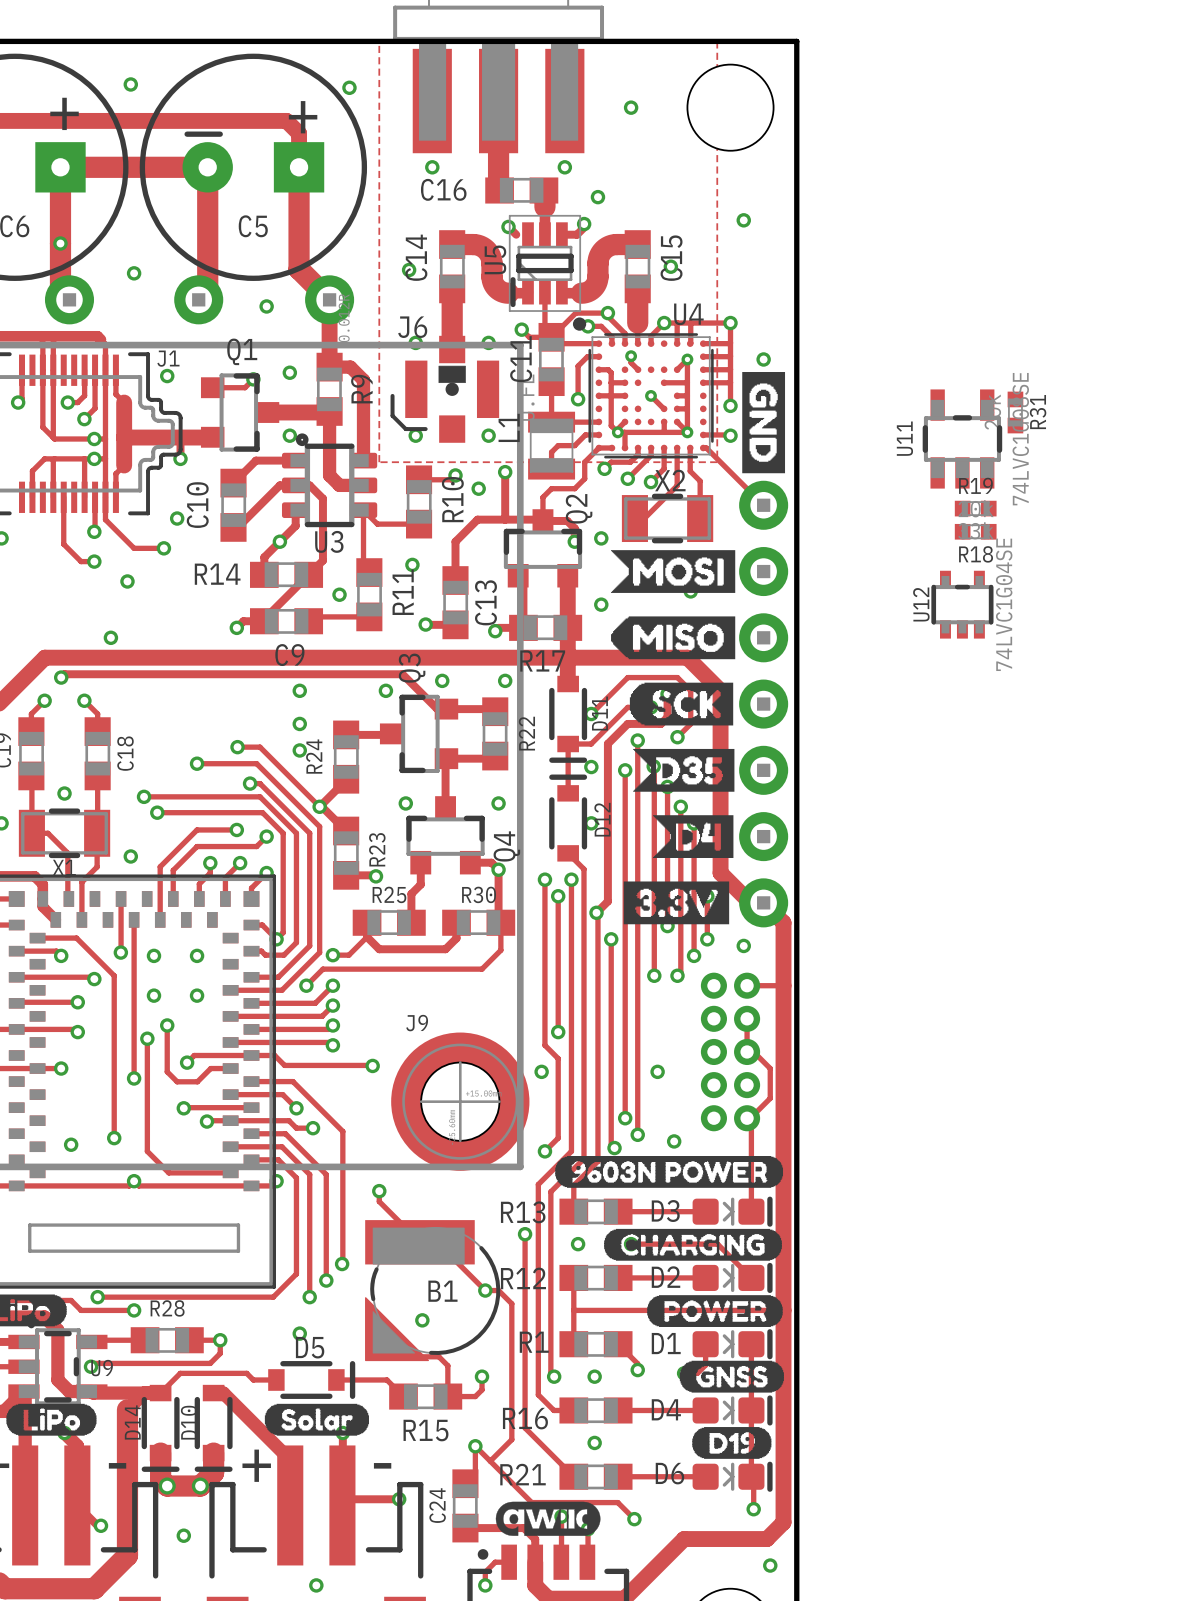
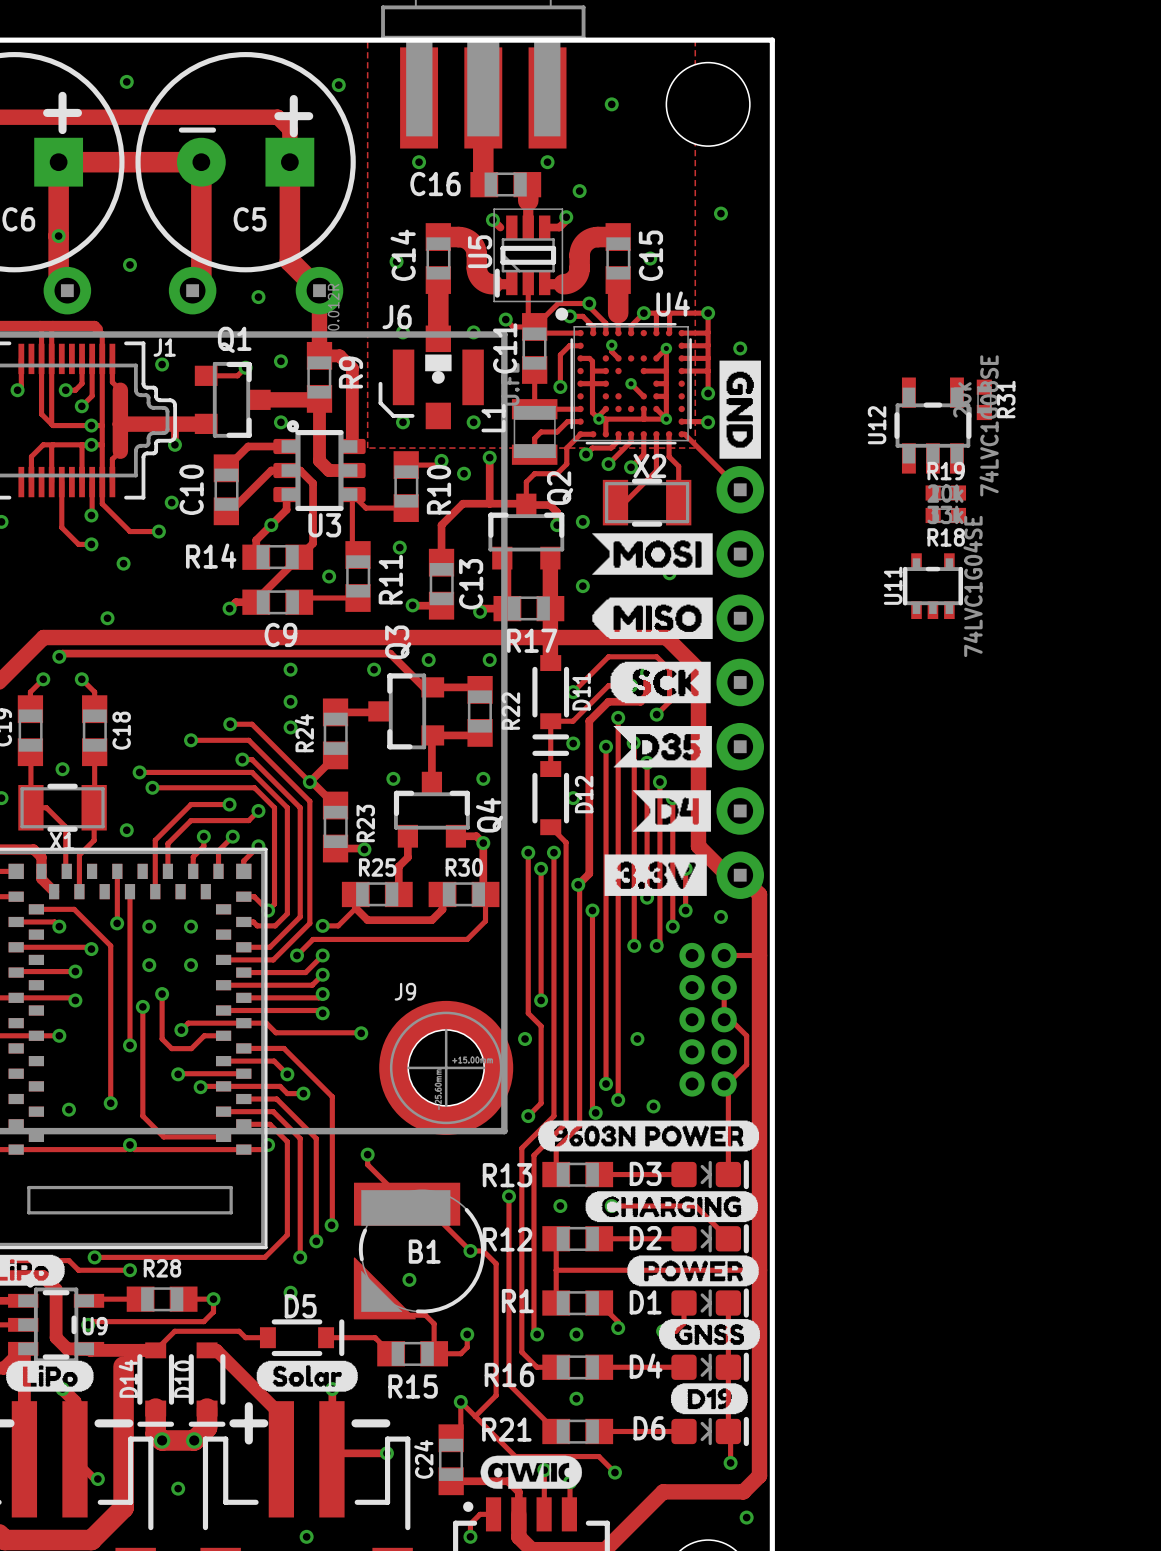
U11 name: U11 (904, 438) -> U12 (877, 425)
U12 name: U12 (921, 604) -> U11 (893, 585)

